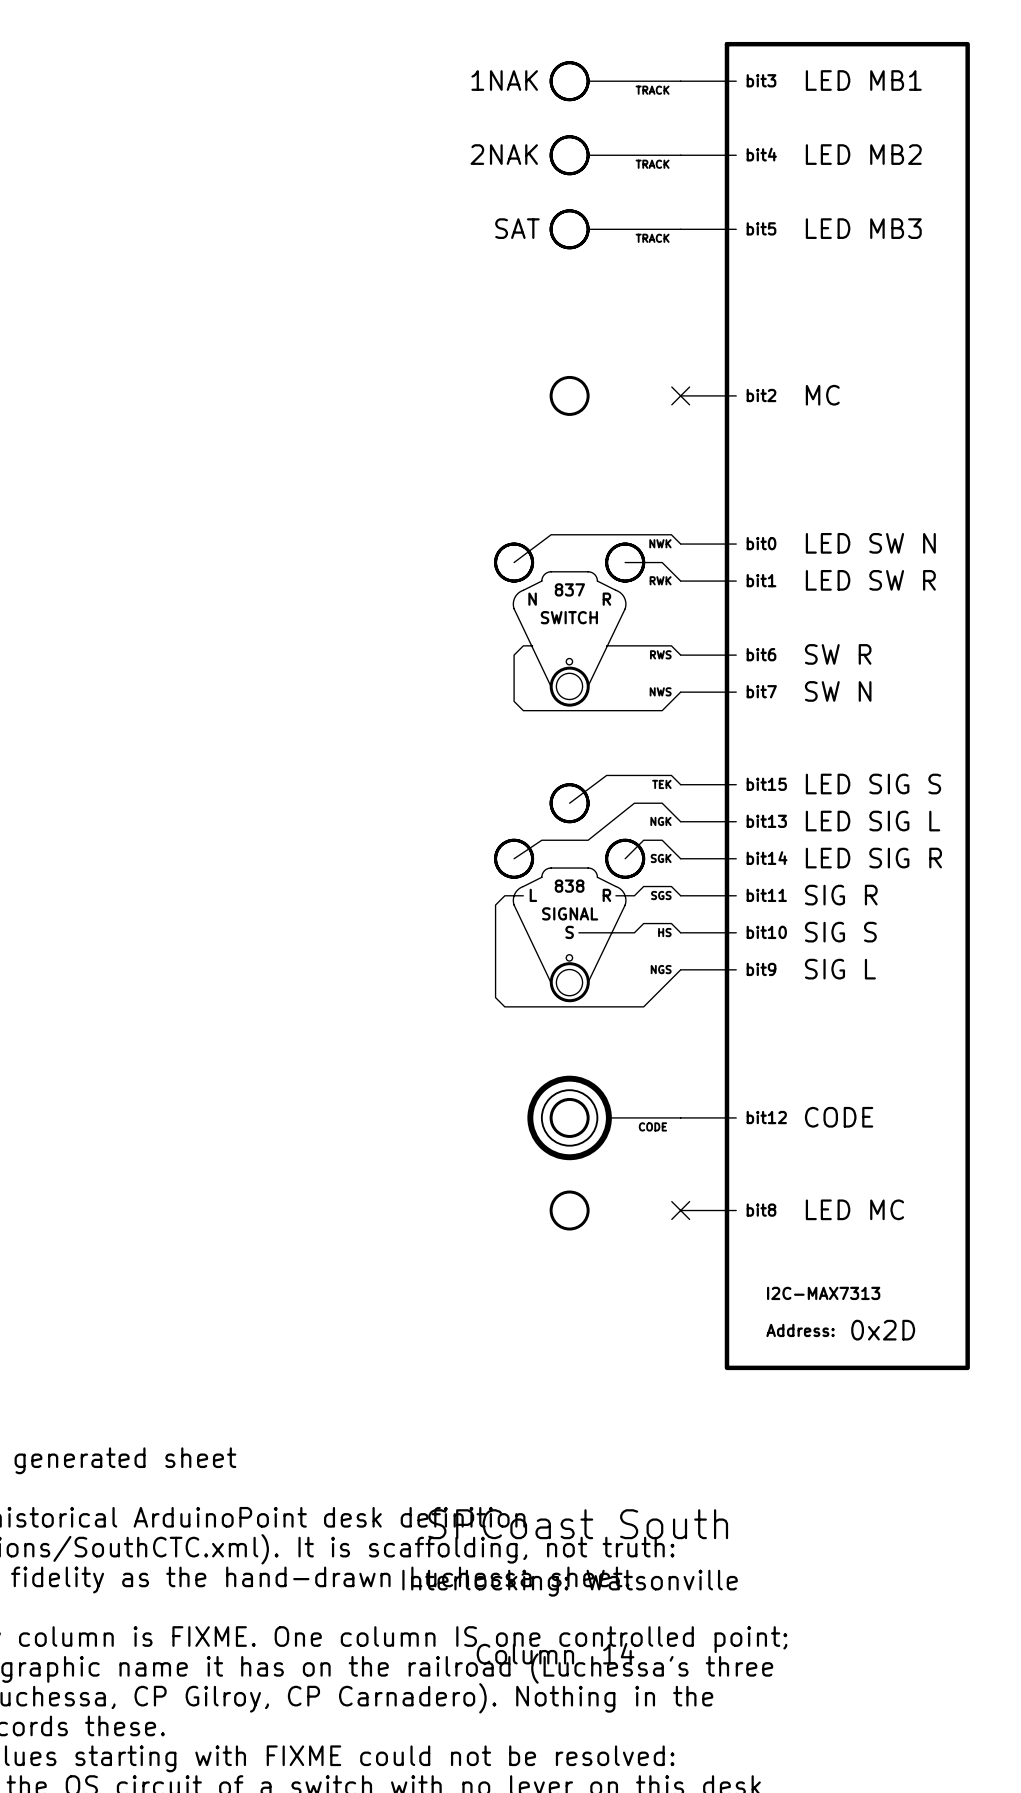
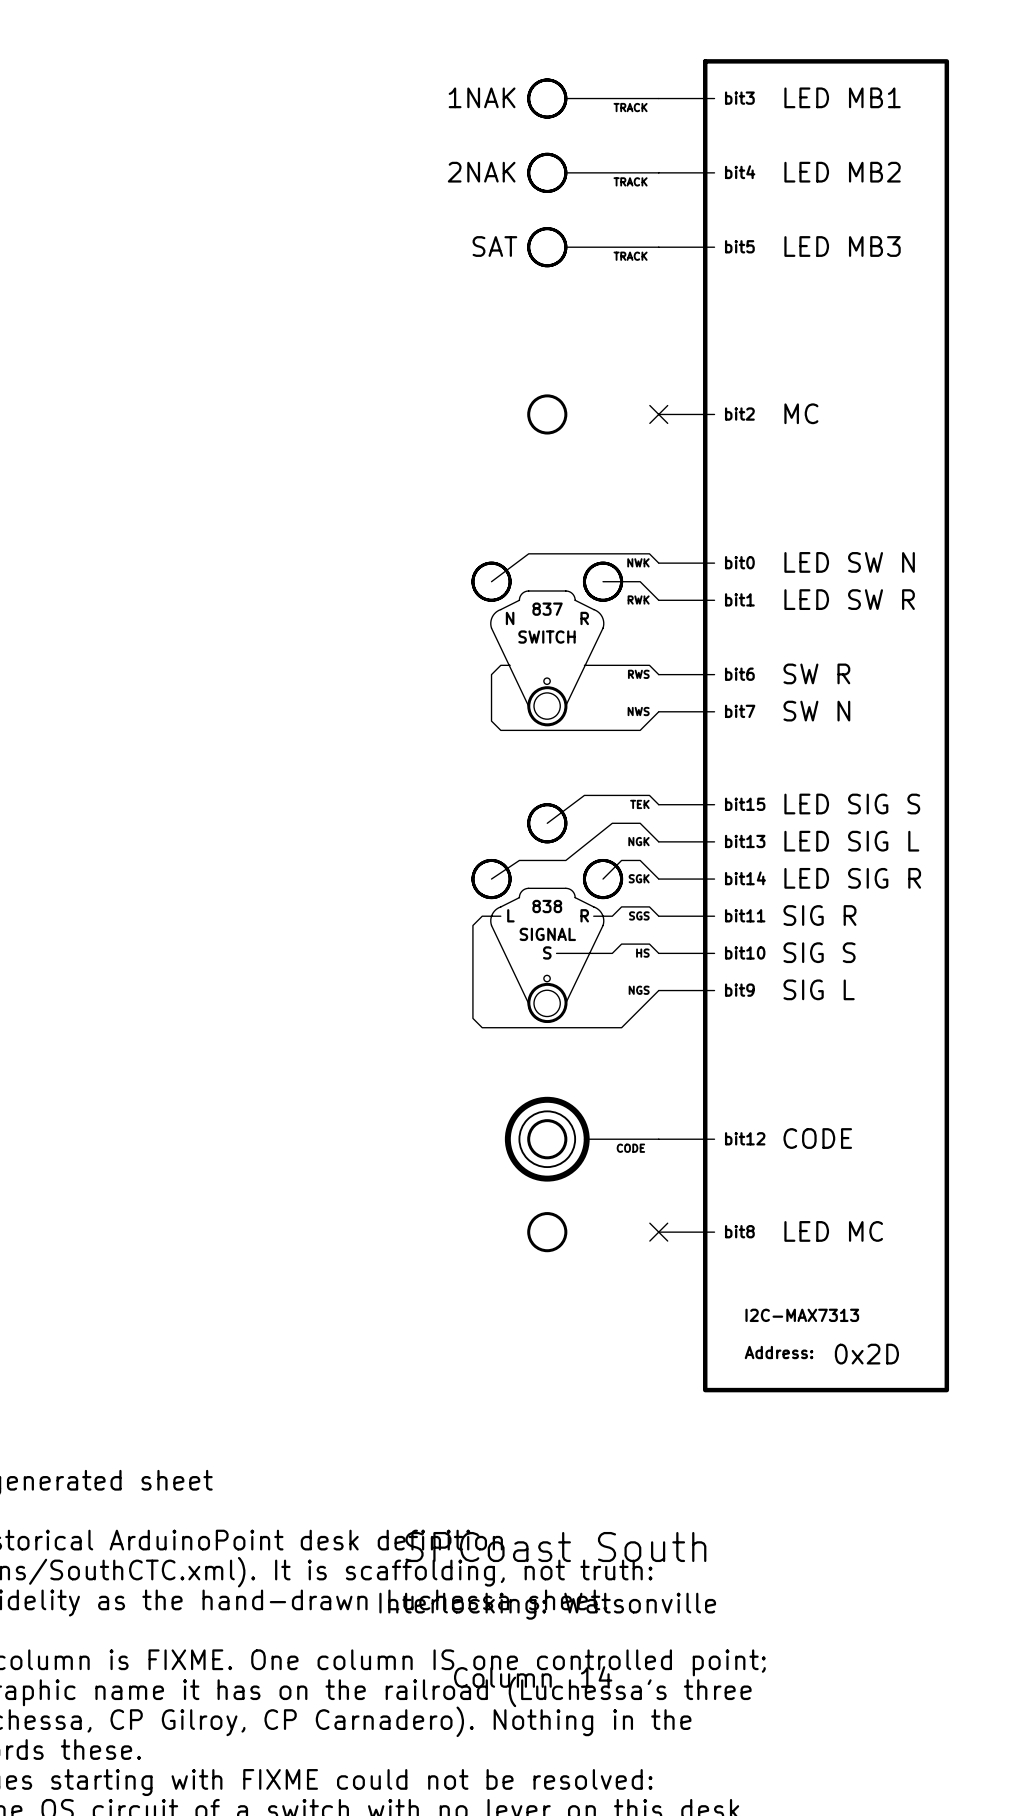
part value: 0x2D (883, 1330) -> none
part text: none -> 0x2D (866, 1354)

